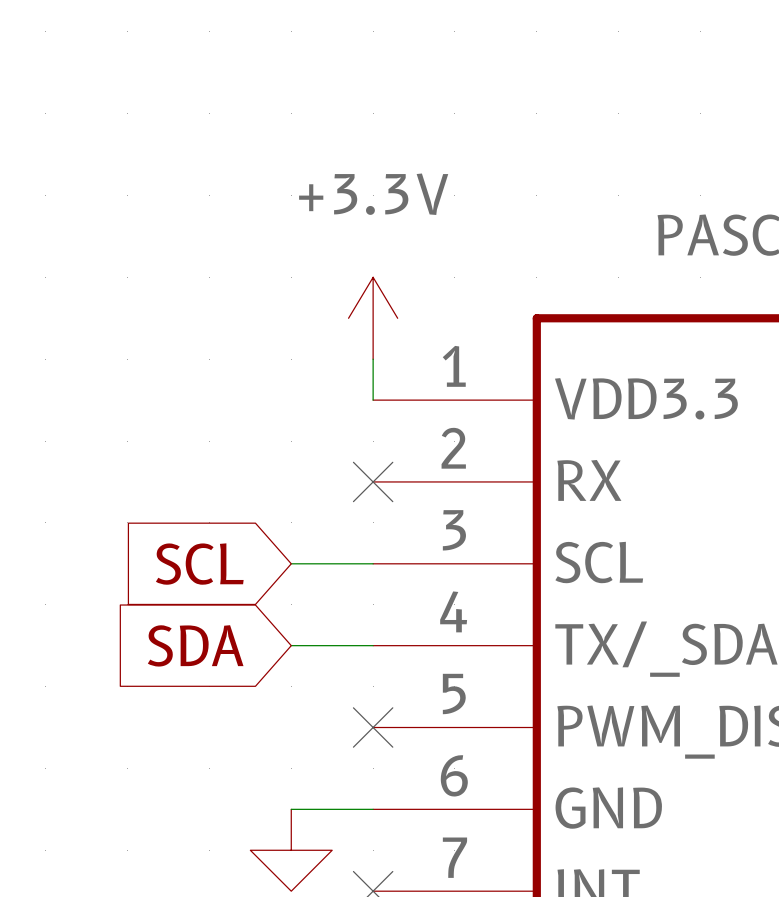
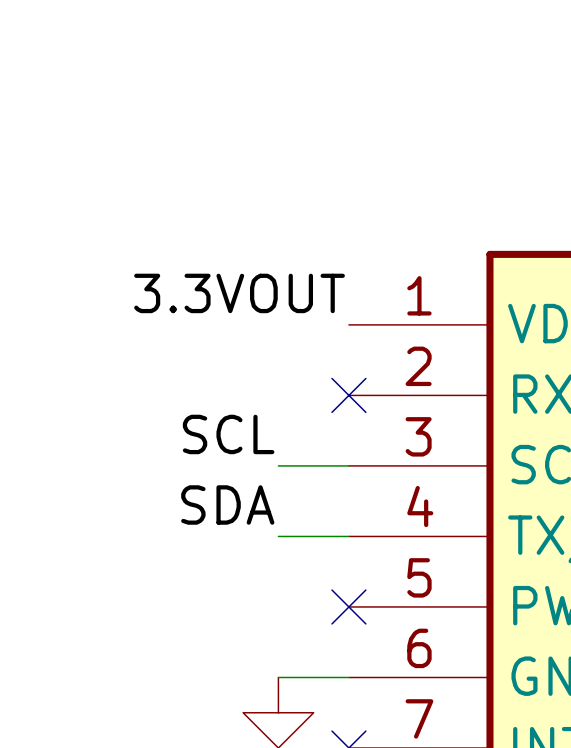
power symbol: +3.3V (373, 318) -> none
wire: (373, 359) (373, 400) -> none
label: none -> 3.3VOUT (239, 293)
label: none -> SCL (228, 434)
global label: SCL (199, 564) -> none
label: none -> SDA (227, 504)
global label: SDA (195, 645) -> none

